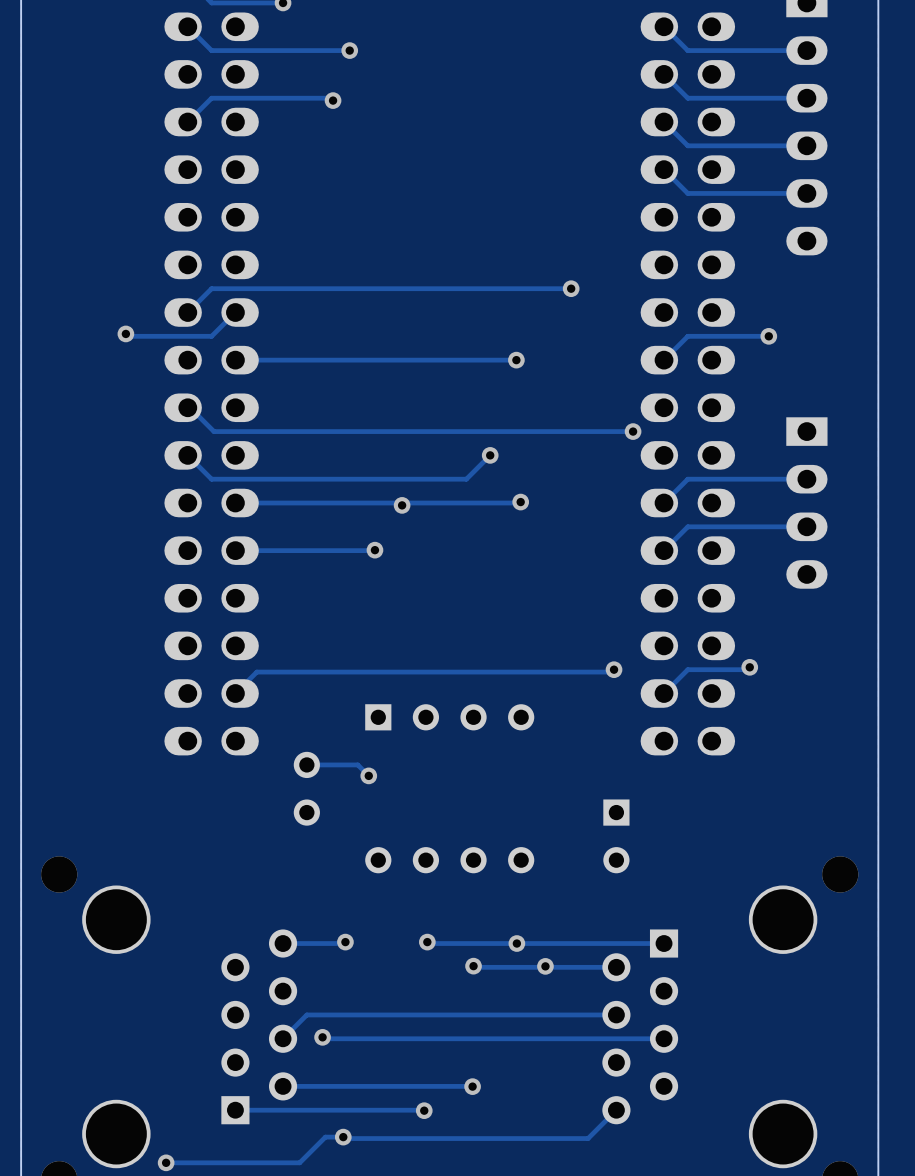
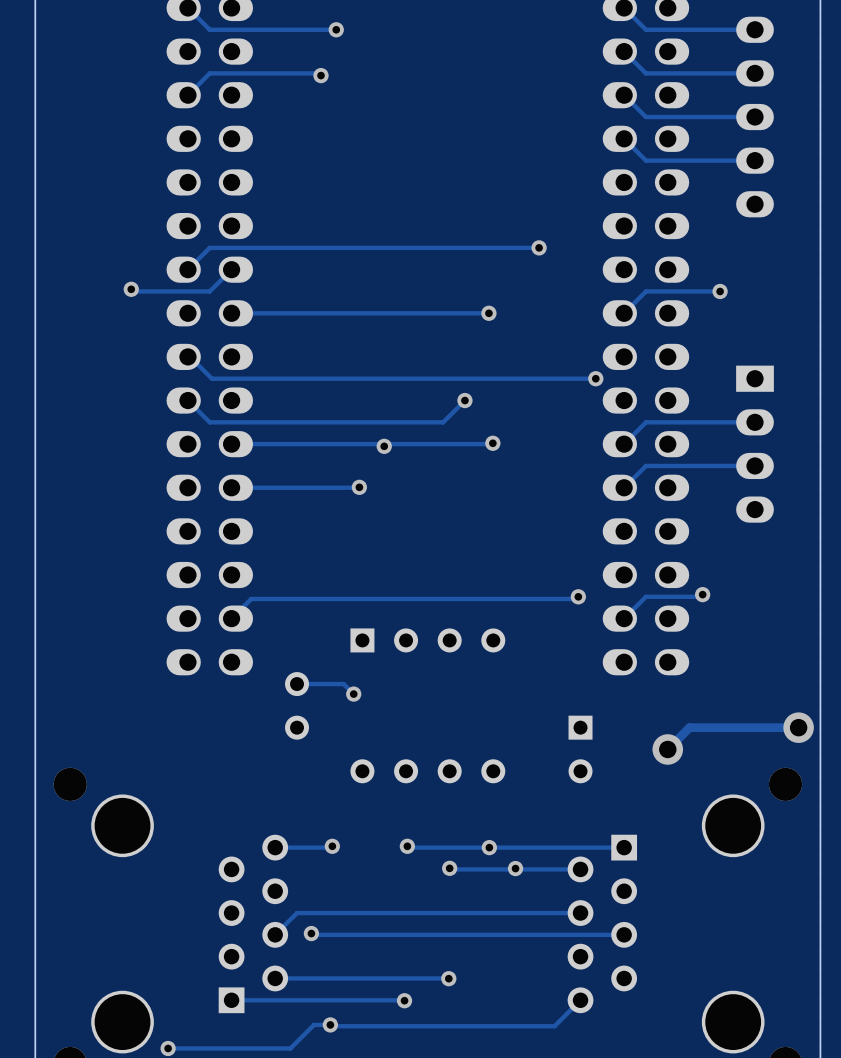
track: none -> (798, 727) (689, 727) (667, 749)
via: none -> (798, 727)
via: none -> (667, 749)

